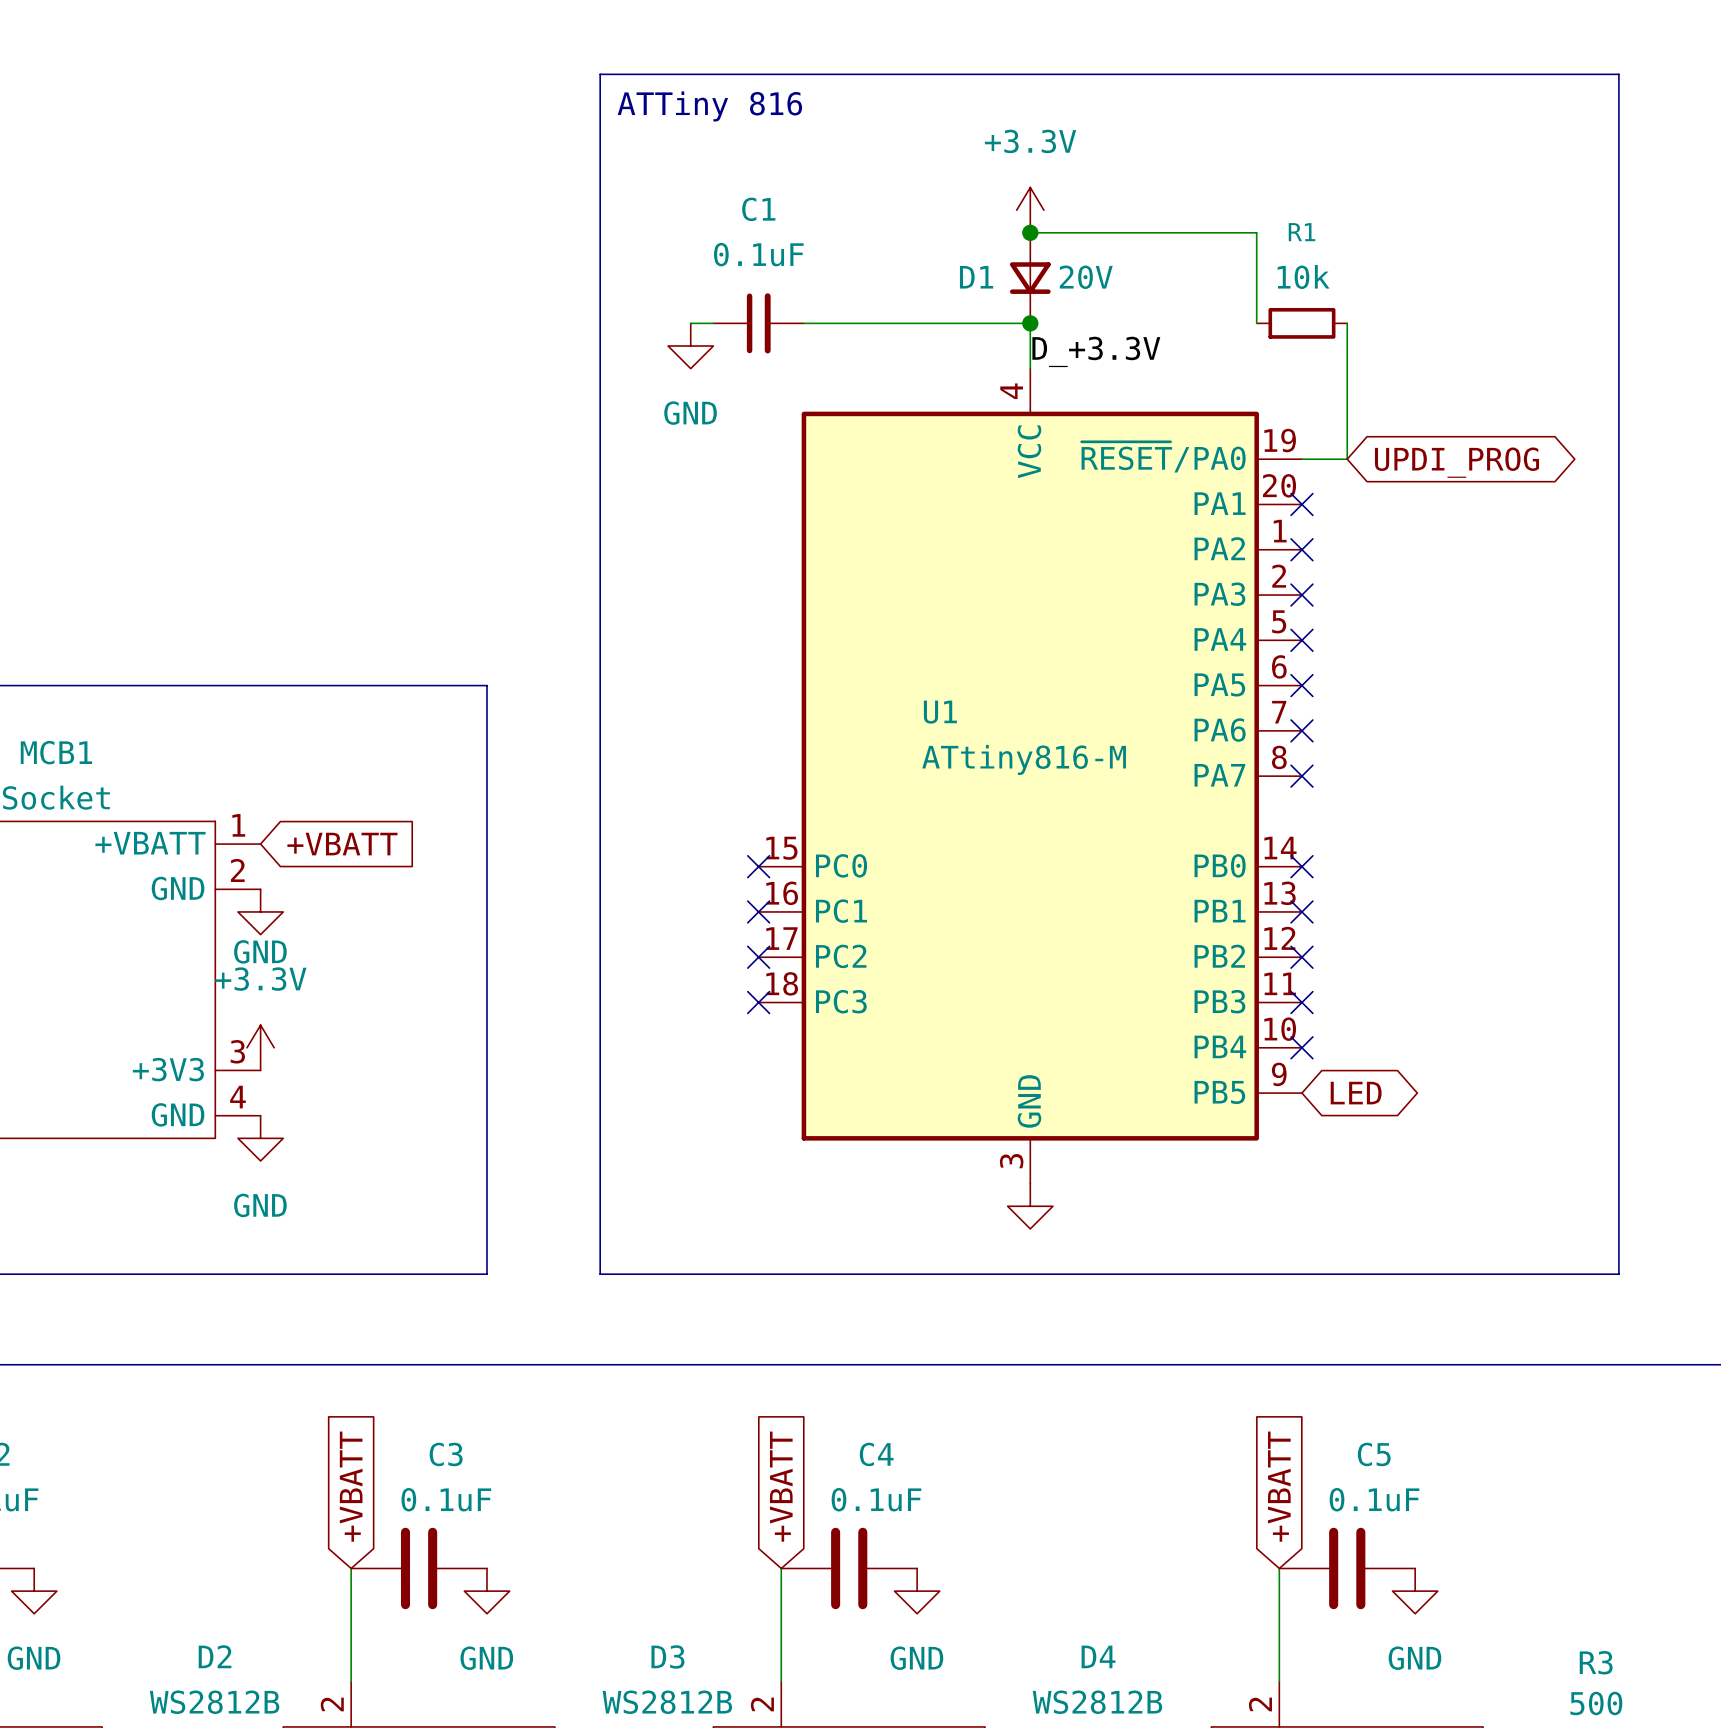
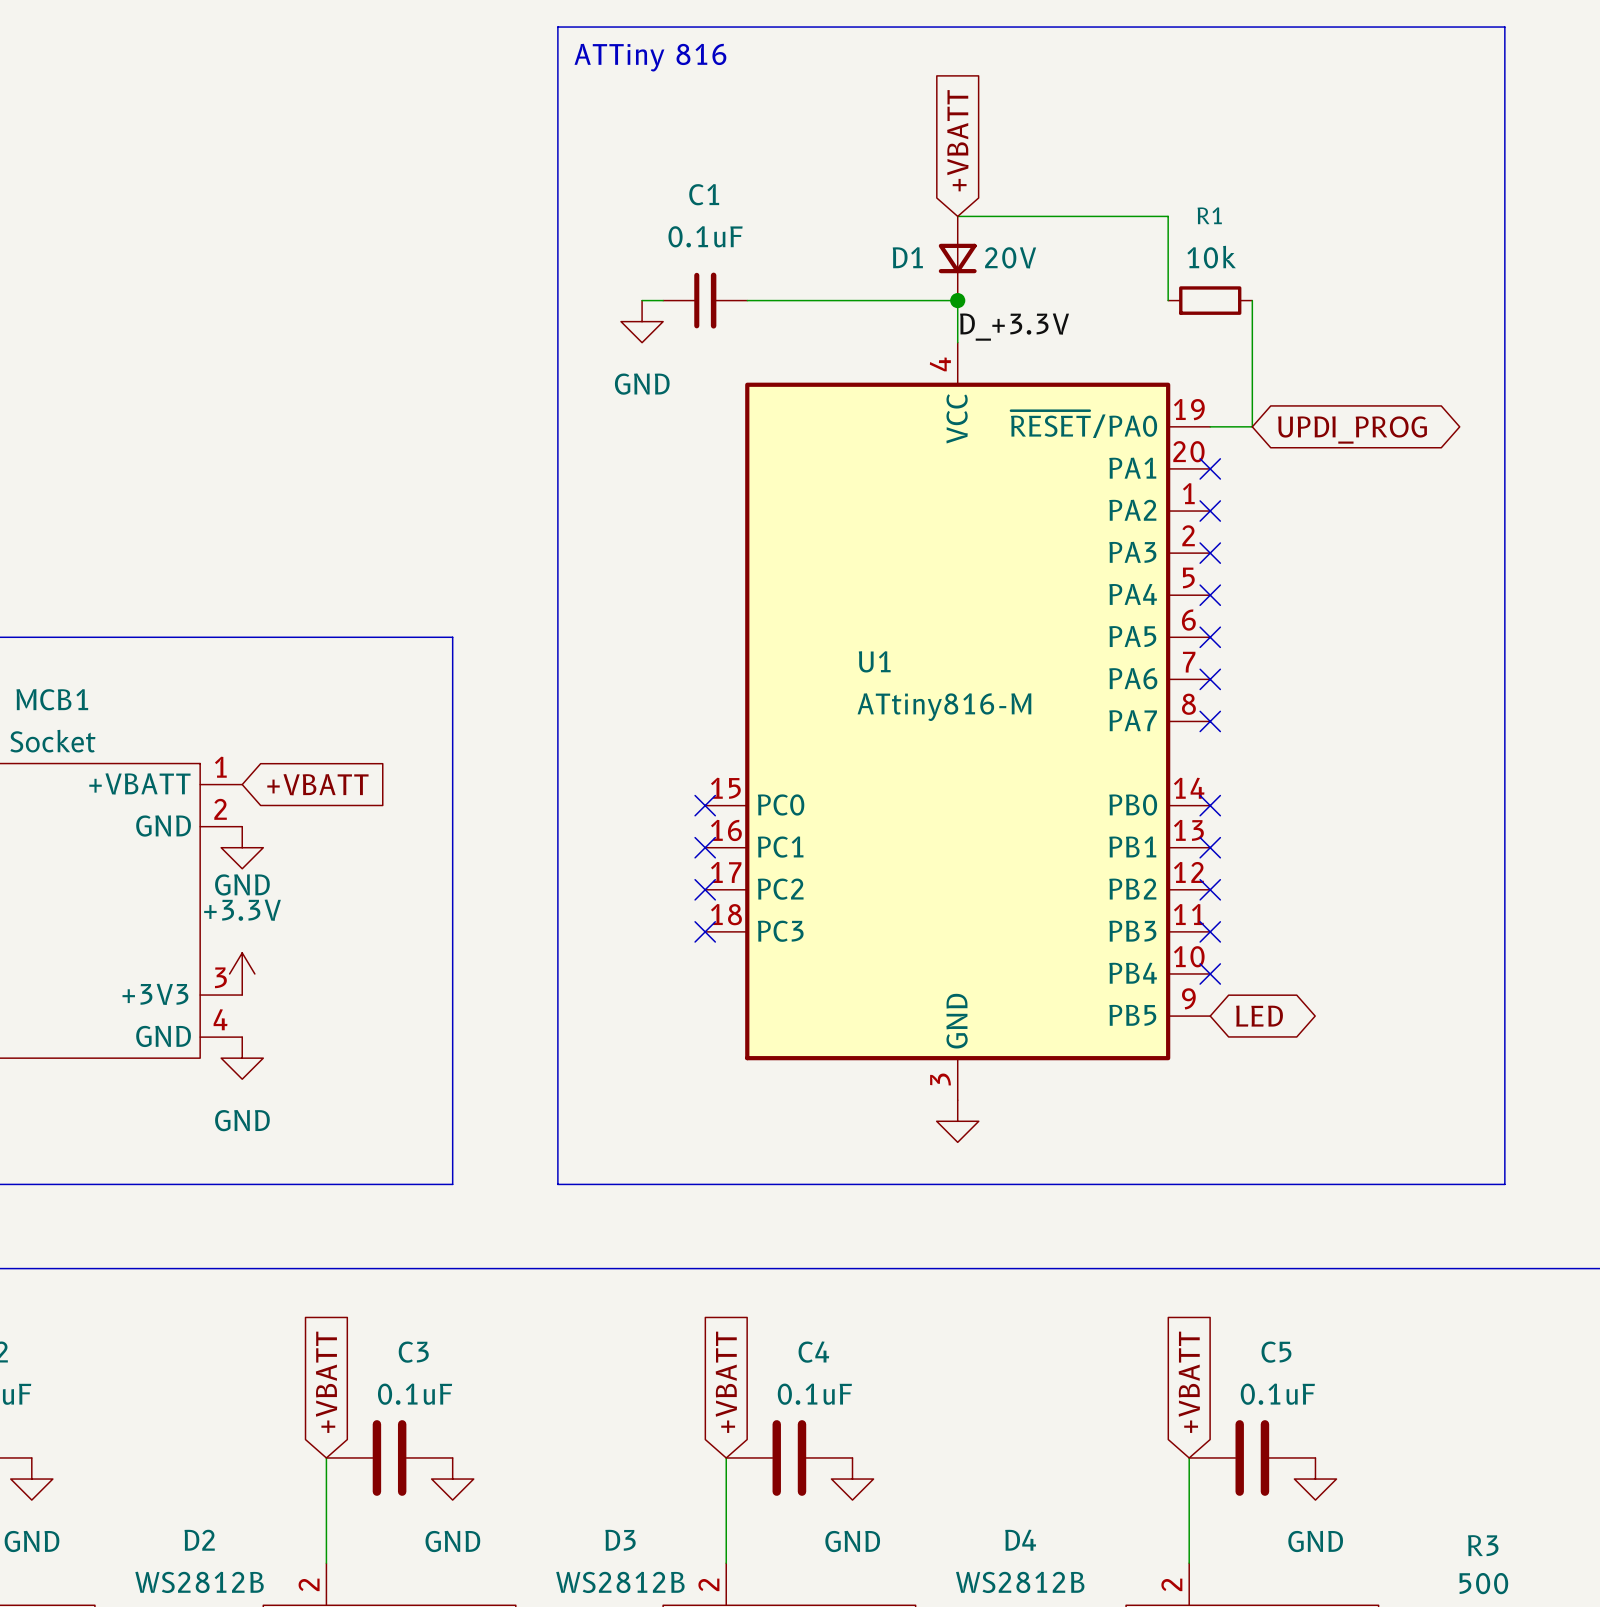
line: (600, 74) (1618, 74) -> (557, 69) (557, 27) (1504, 27) (1504, 69)
text position: ATTiny 816 (709, 106) -> ATTiny 816 (650, 57)
global label: none -> +VBATT (957, 140)
power symbol: +3.3V (1030, 210) -> none
junction: (1030, 232) -> none

